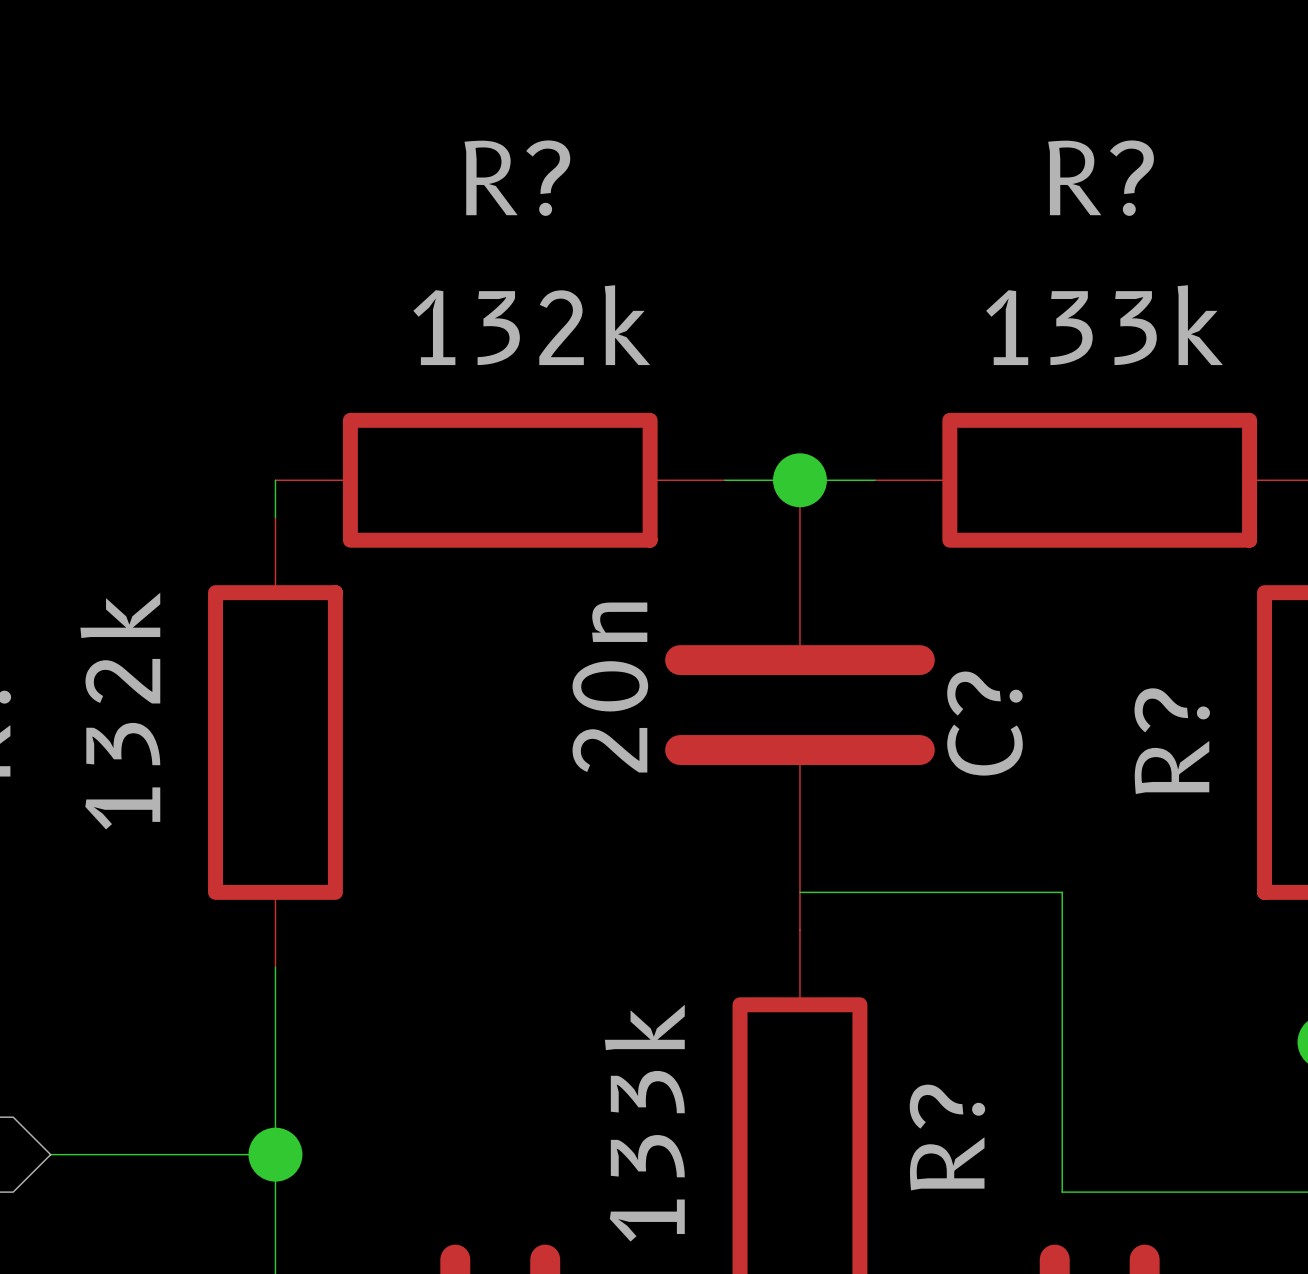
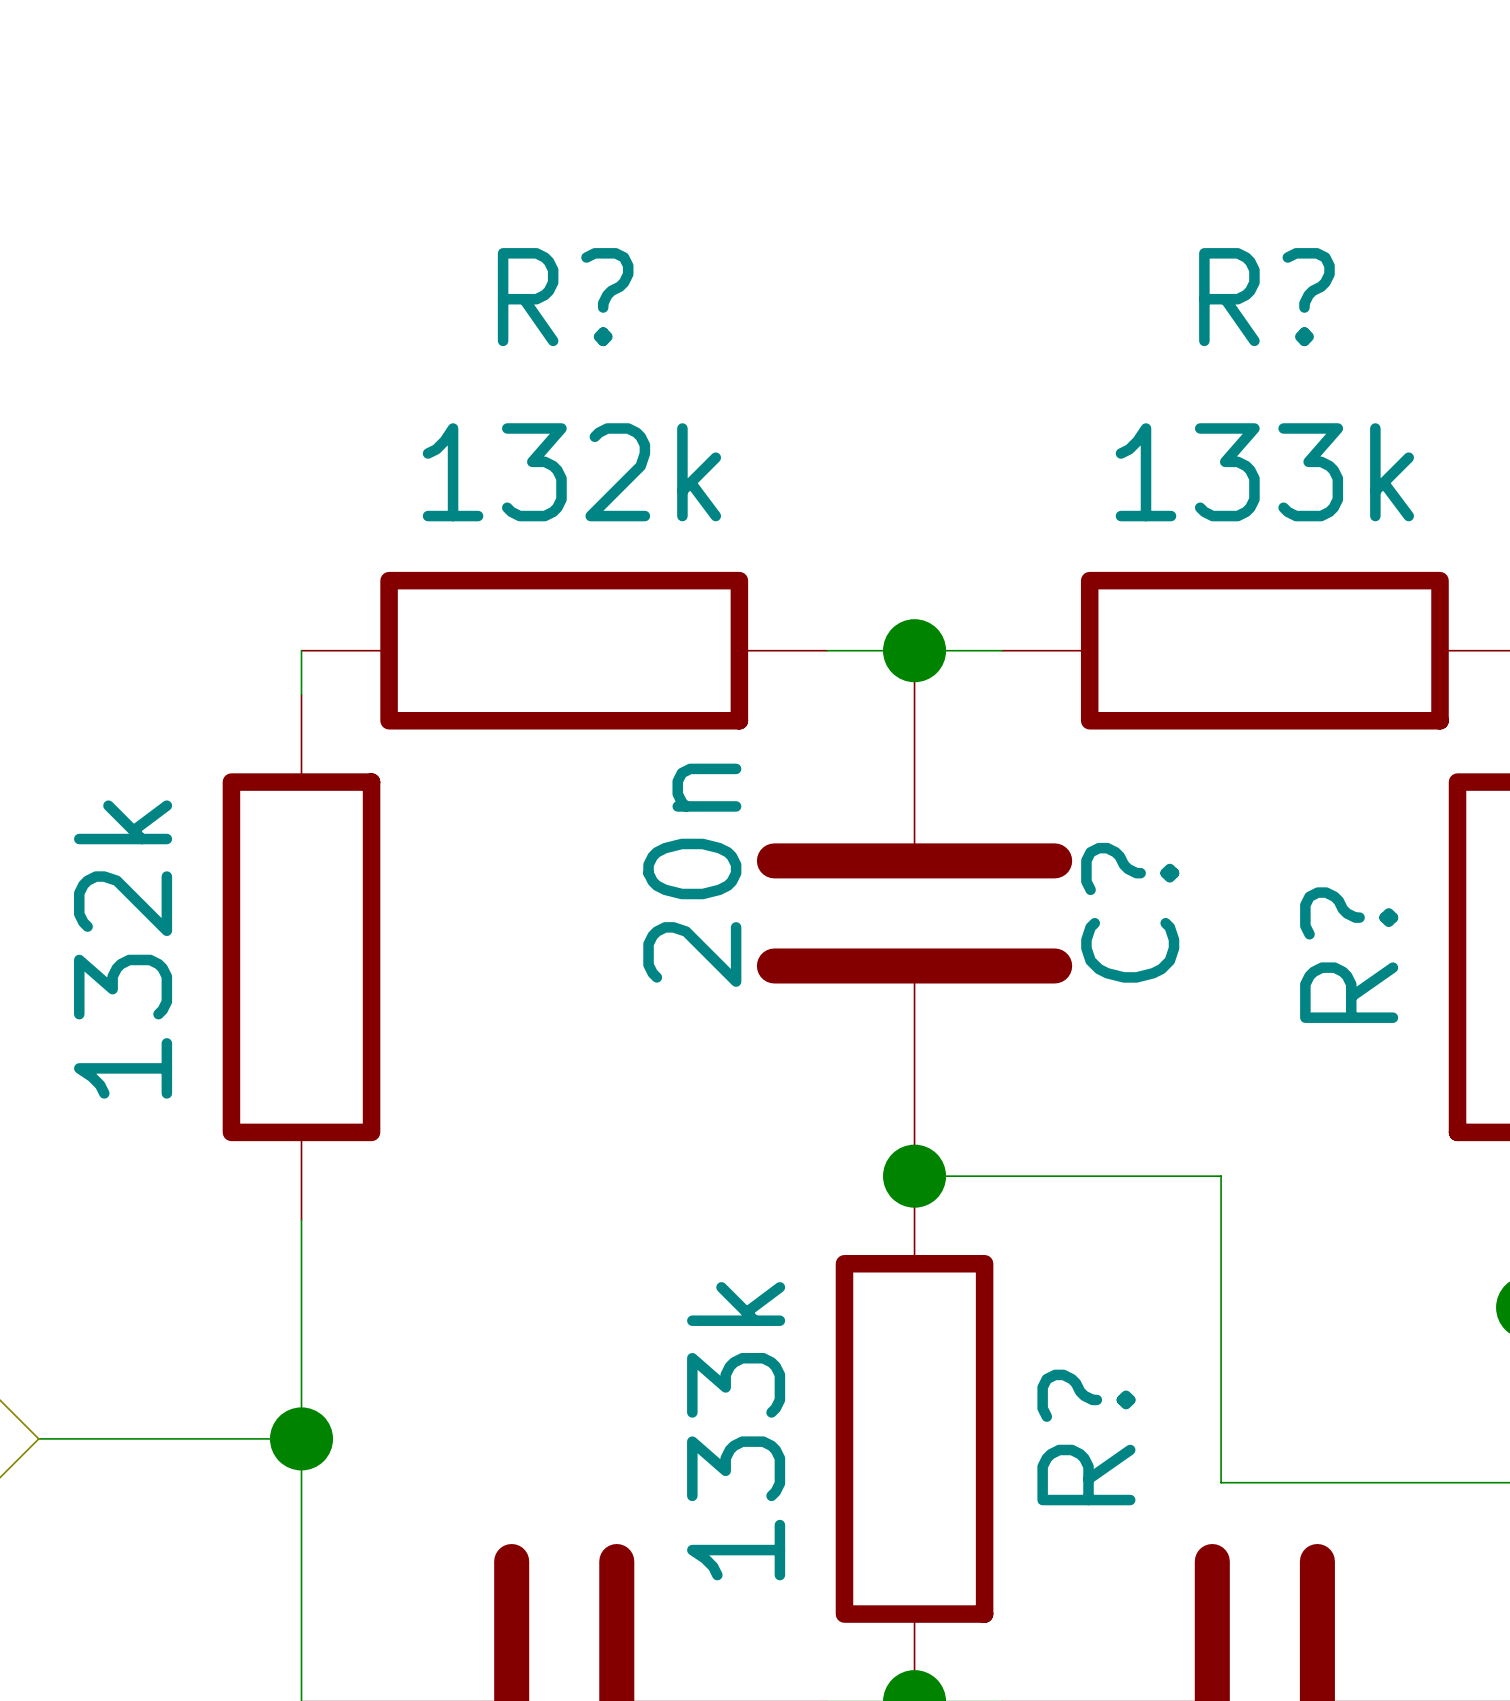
wire: (799, 892) (1062, 892) (1062, 929) -> (914, 1176) (1221, 1176)
junction: none -> (914, 1176)

